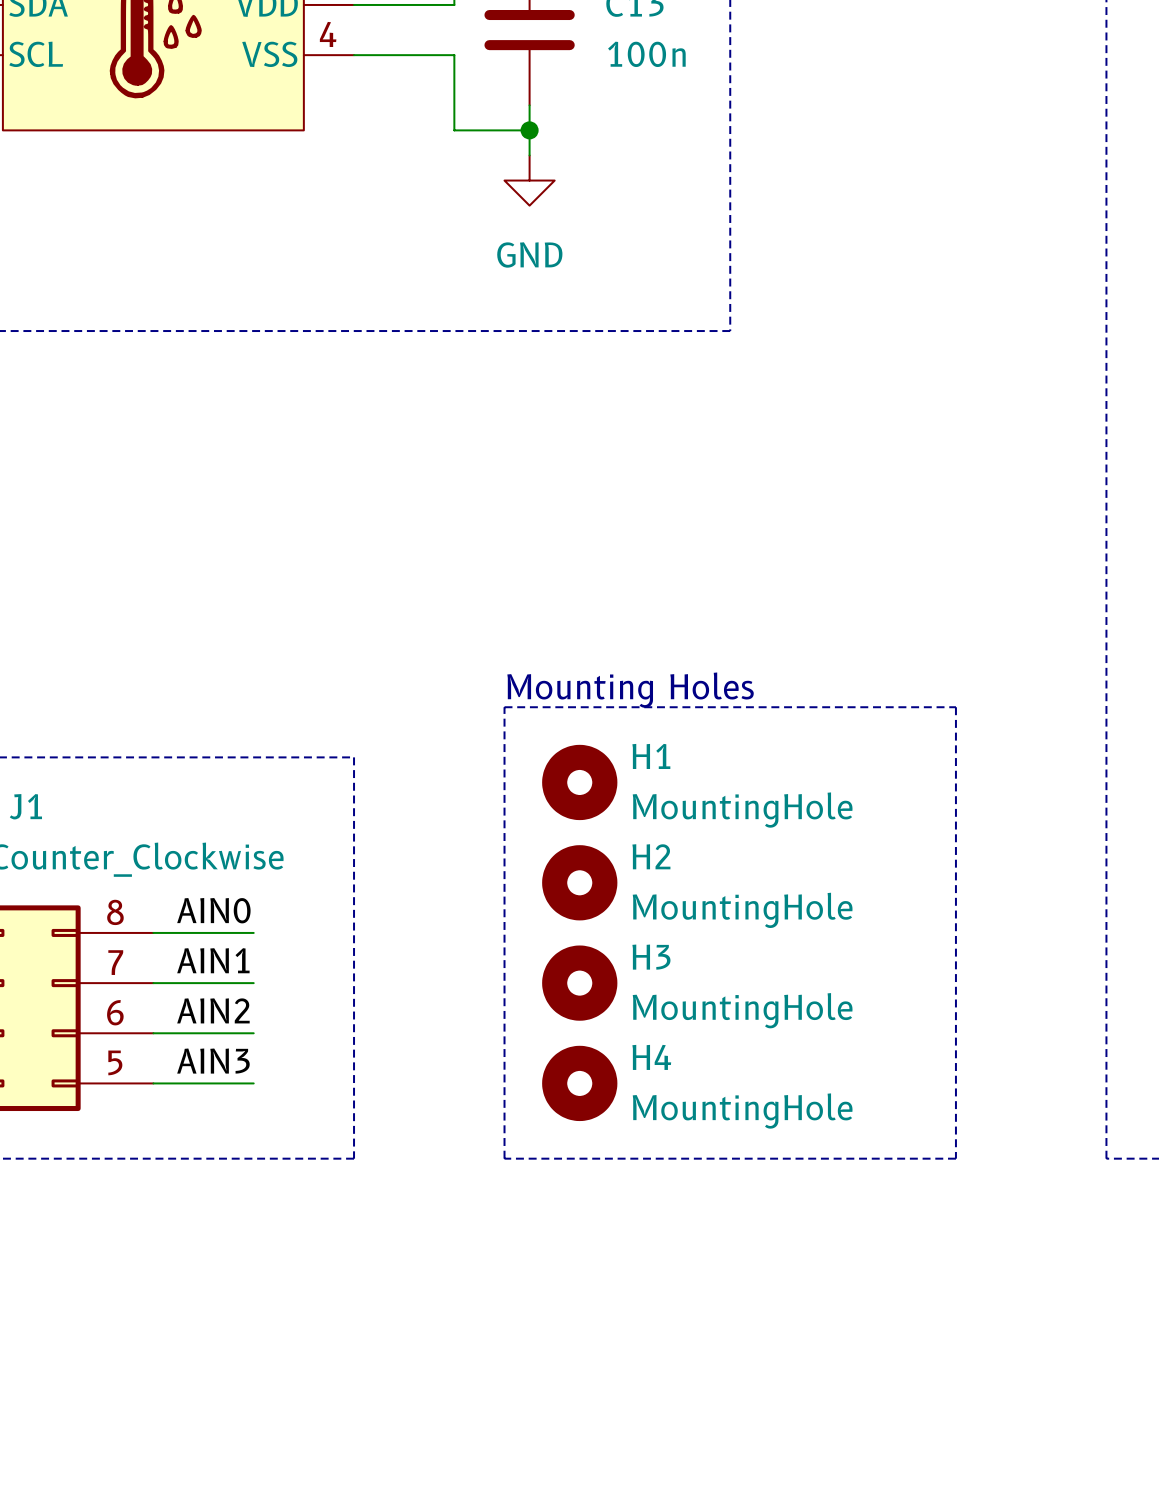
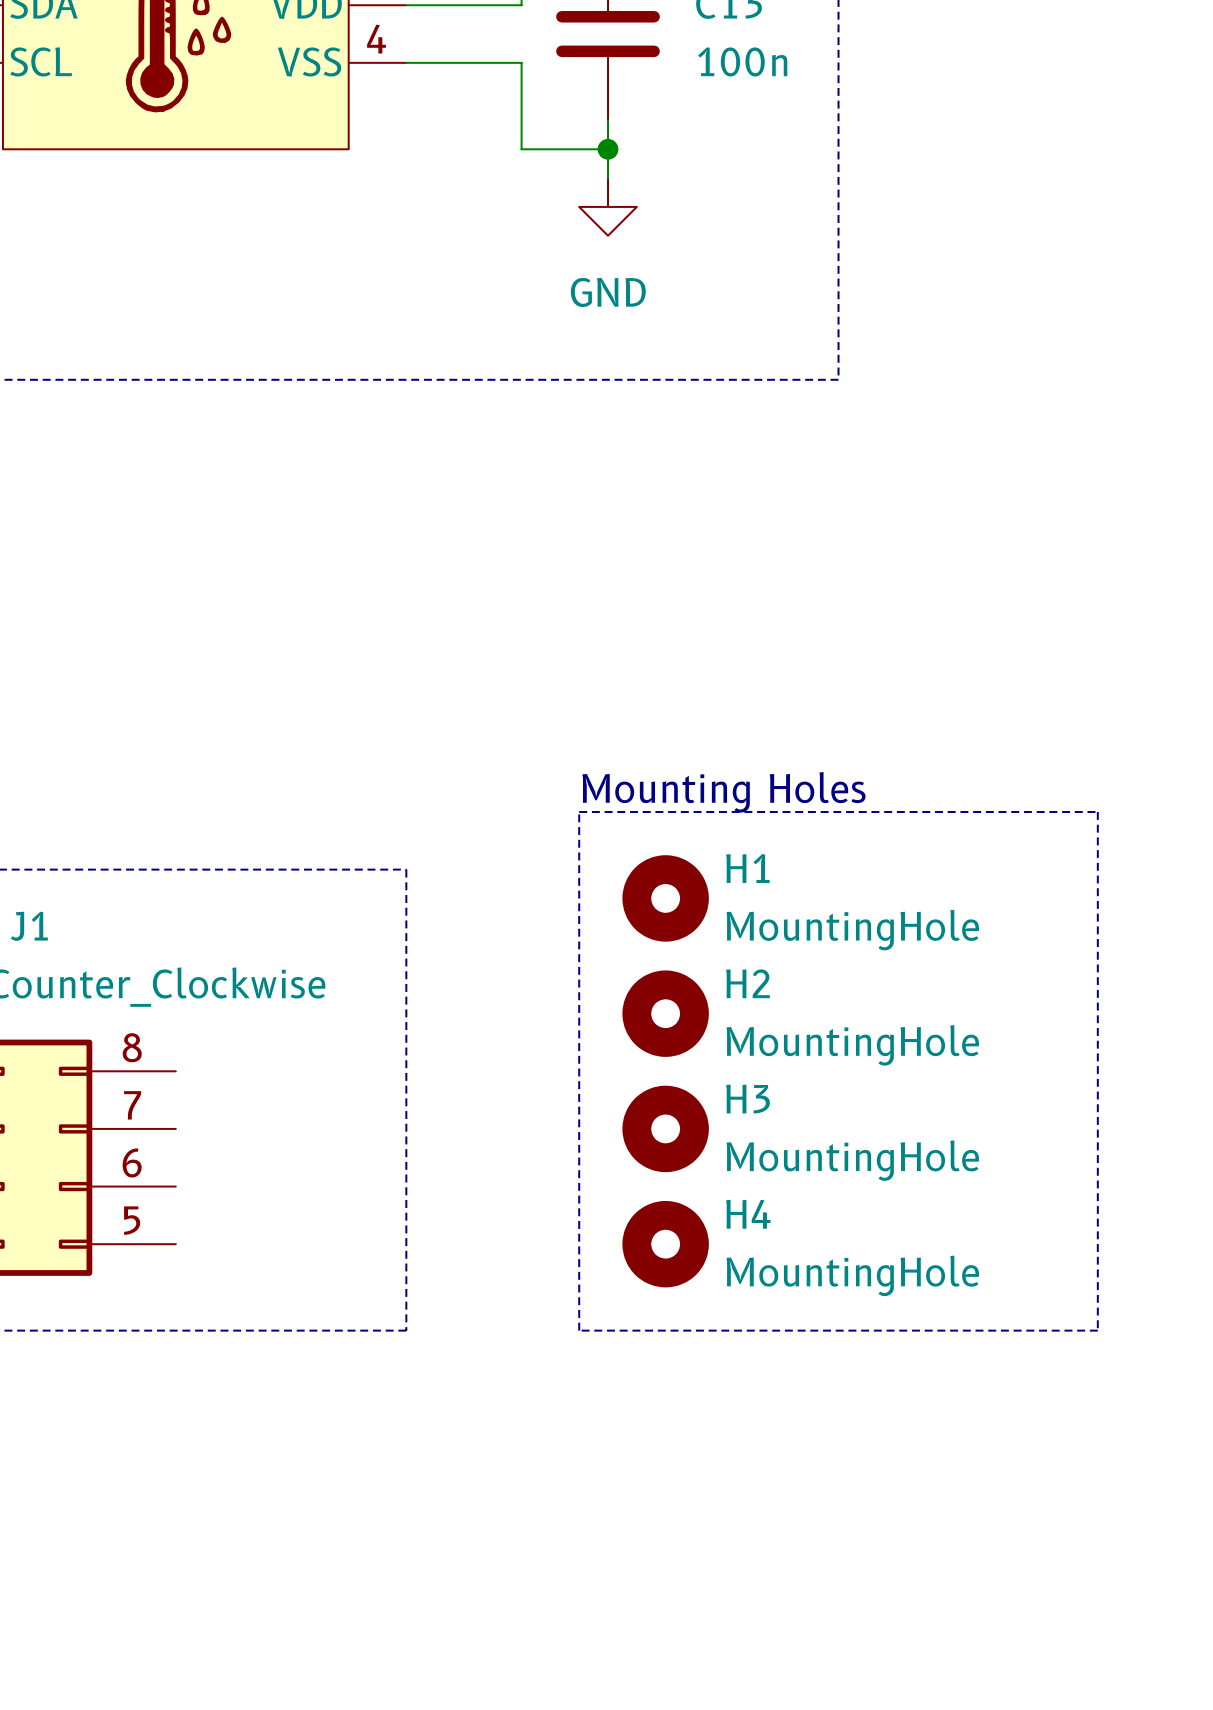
label: AIN0 (213, 910) -> none
wire: (153, 932) (253, 932) -> none
label: AIN1 (213, 960) -> none
wire: (153, 983) (253, 983) -> none
label: AIN2 (213, 1010) -> none
wire: (153, 1033) (253, 1033) -> none
label: AIN3 (213, 1061) -> none
wire: (153, 1083) (253, 1083) -> none

